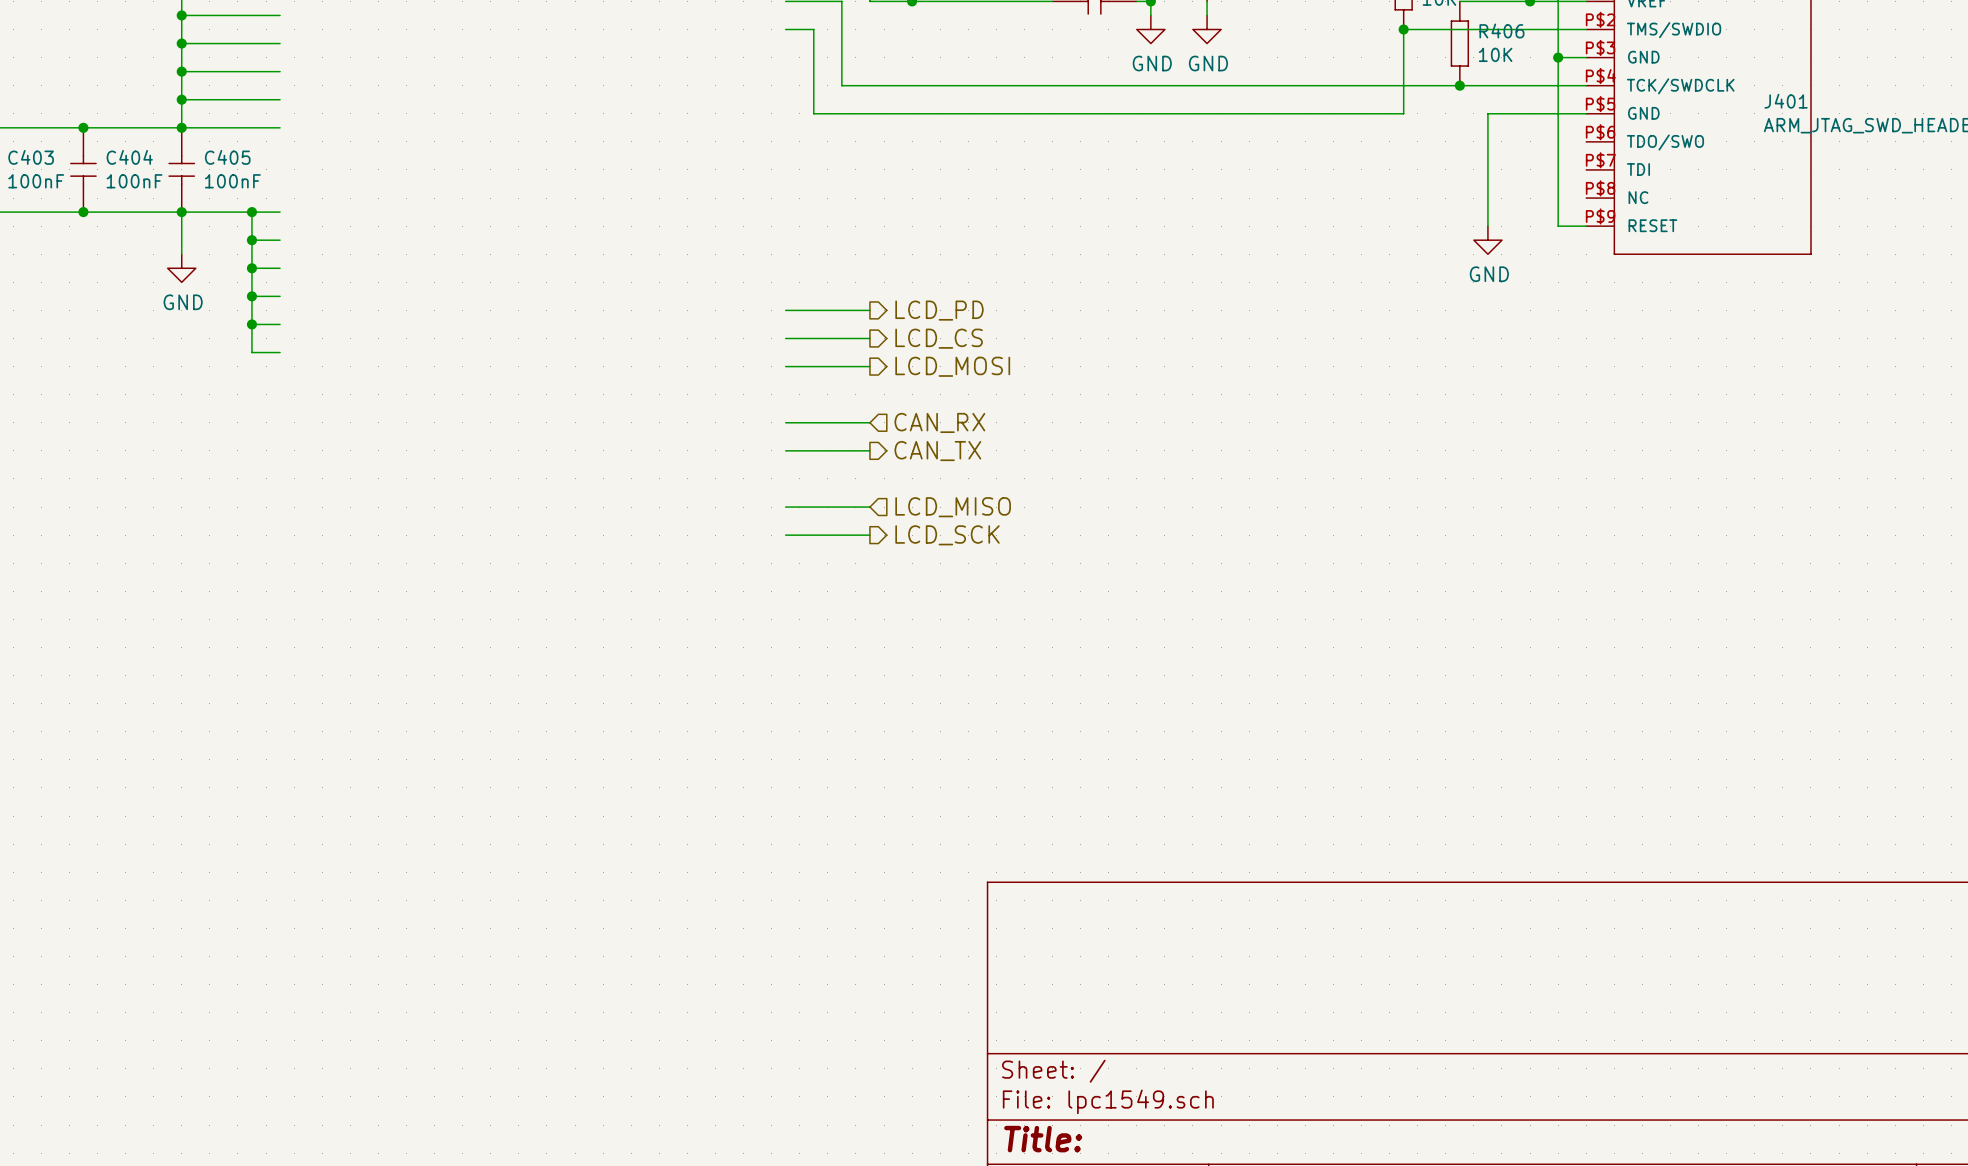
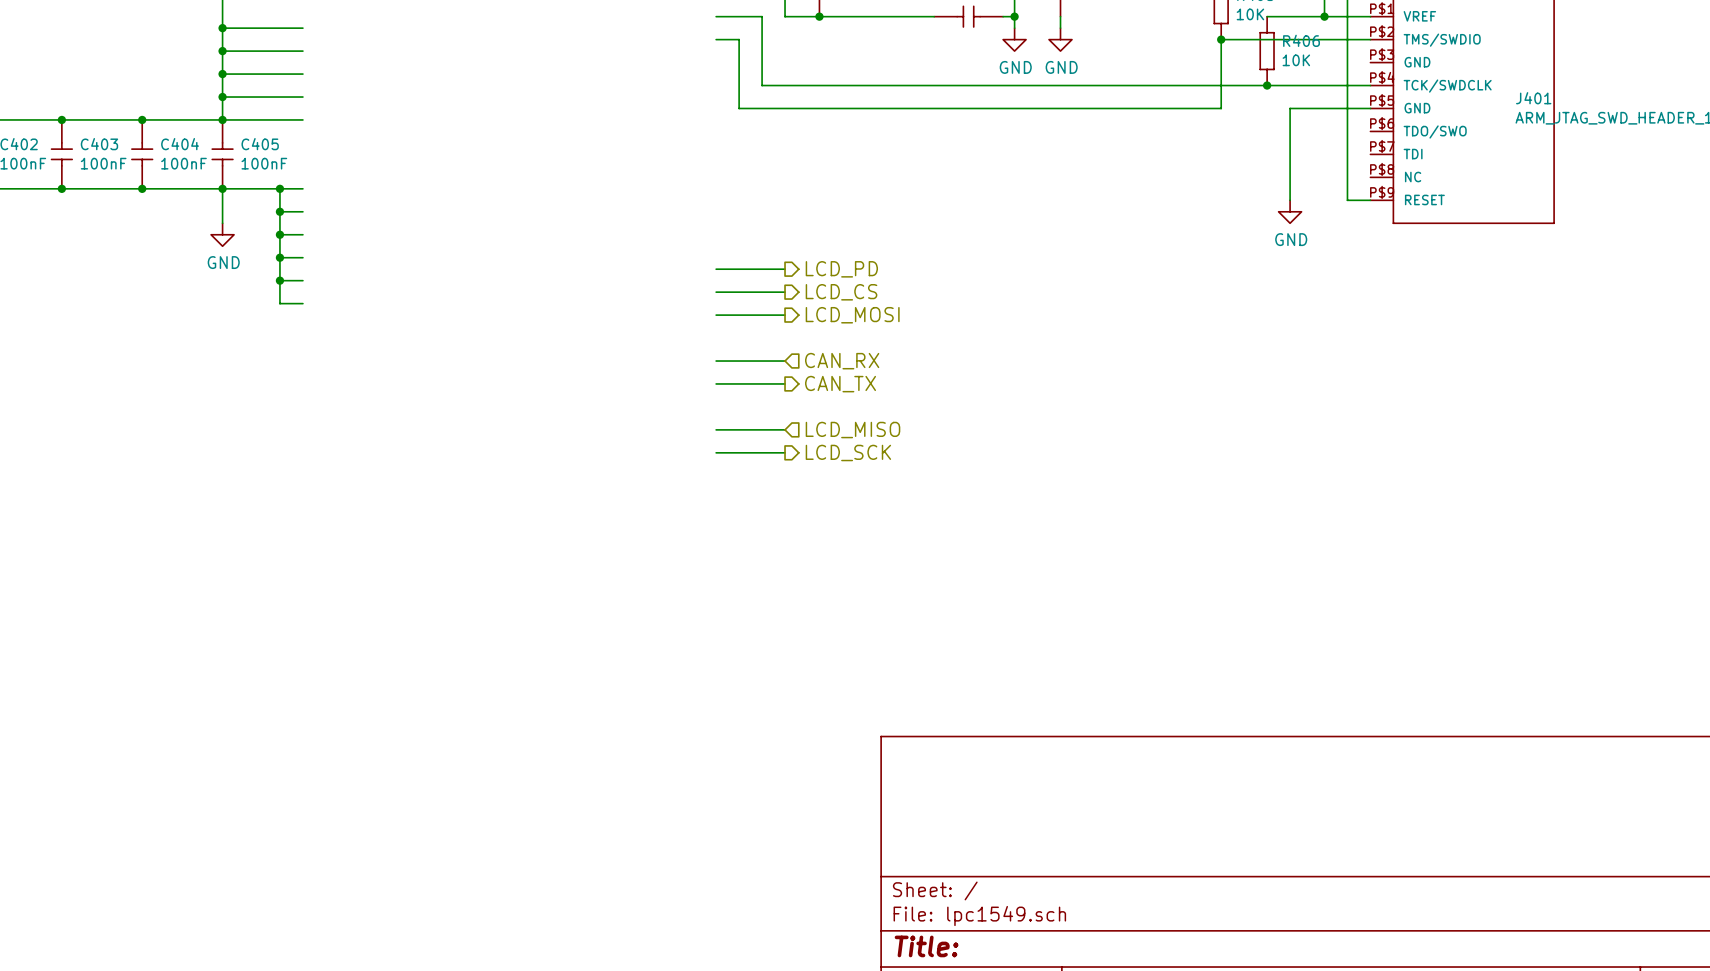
wire: (1558, 57) (1586, 57) -> none
junction: (1558, 57) -> none

